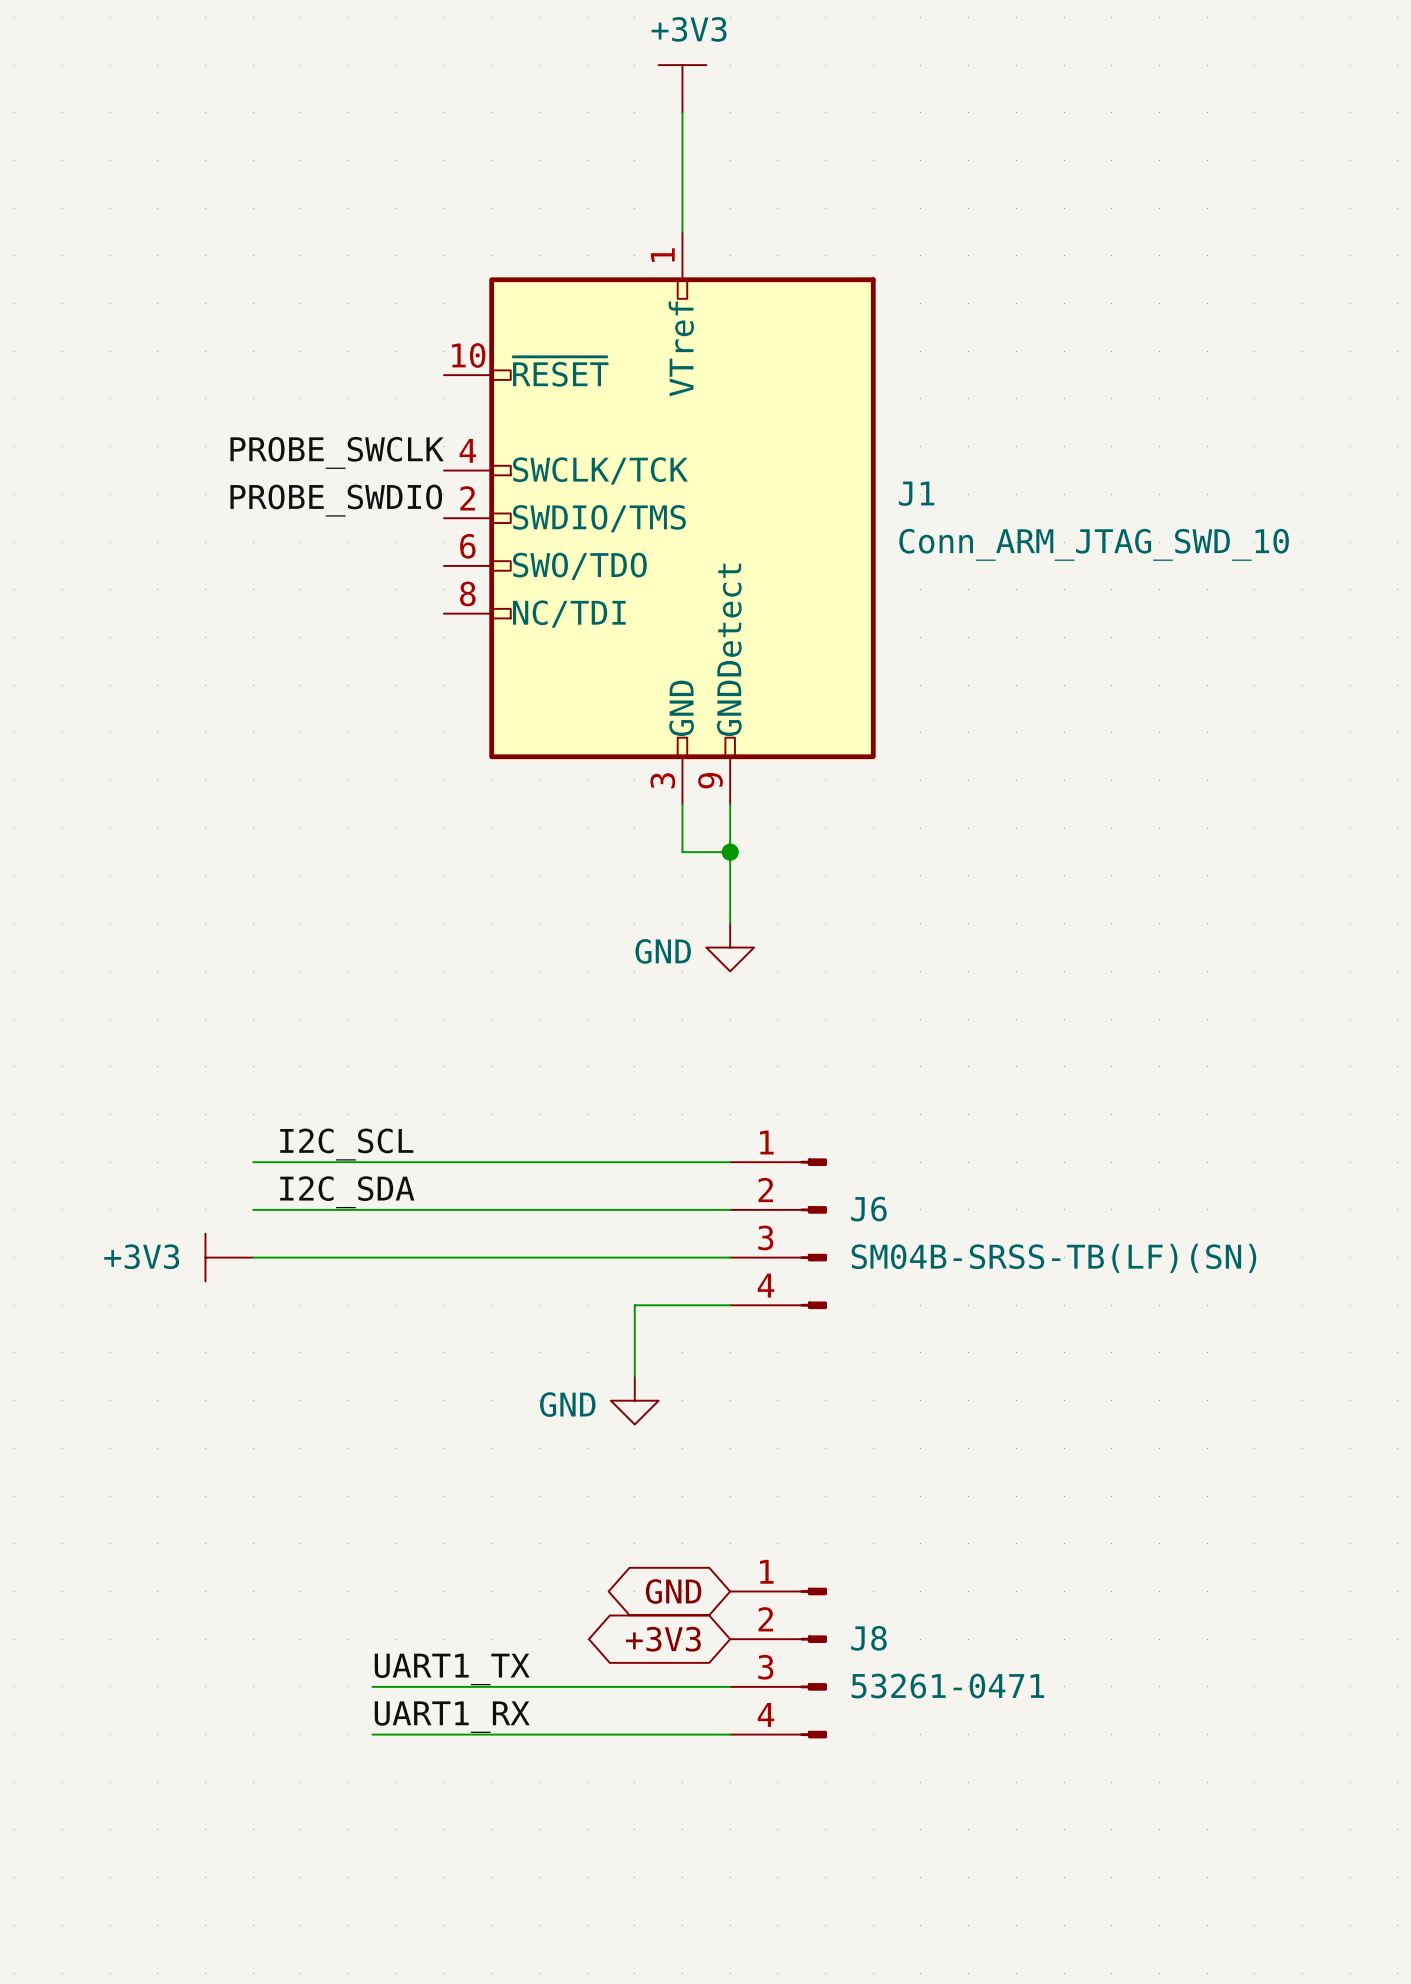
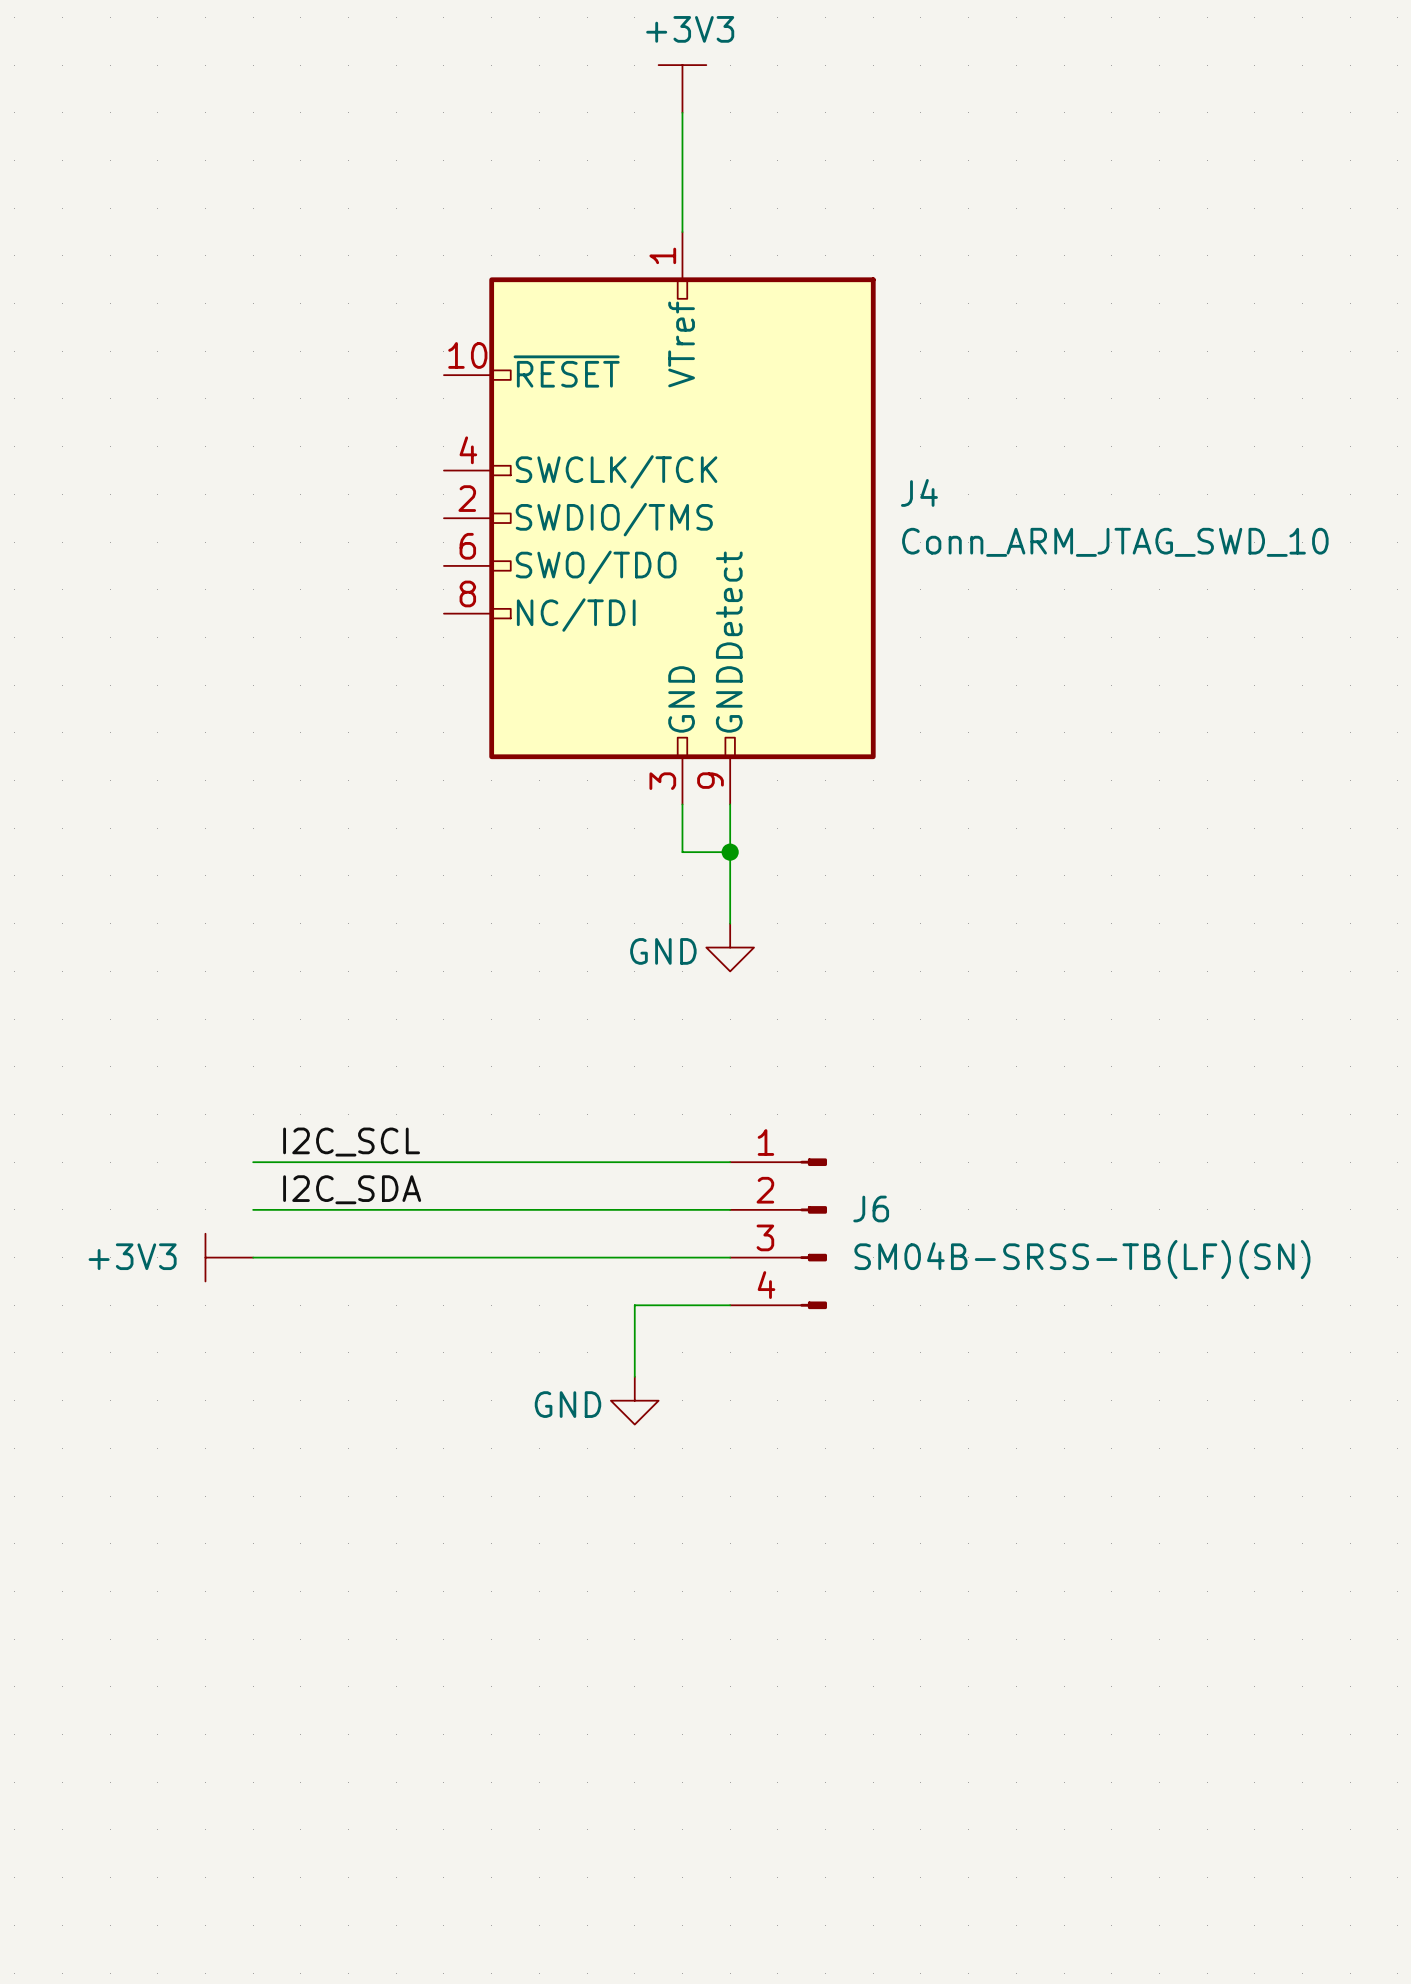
label: PROBE_SWCLK (337, 452) -> none
J1 name: J1 (916, 493) -> J4 (919, 492)
label: PROBE_SWDIO (336, 500) -> none
global label: GND (673, 1591) -> none
global label: +3V3 (663, 1639) -> none
J8: 53261-0471 (778, 1663) -> none
label: UART1_TX (452, 1669) -> none
wire: (372, 1686) (730, 1686) -> none
label: UART1_RX (452, 1717) -> none
wire: (372, 1734) (730, 1734) -> none

